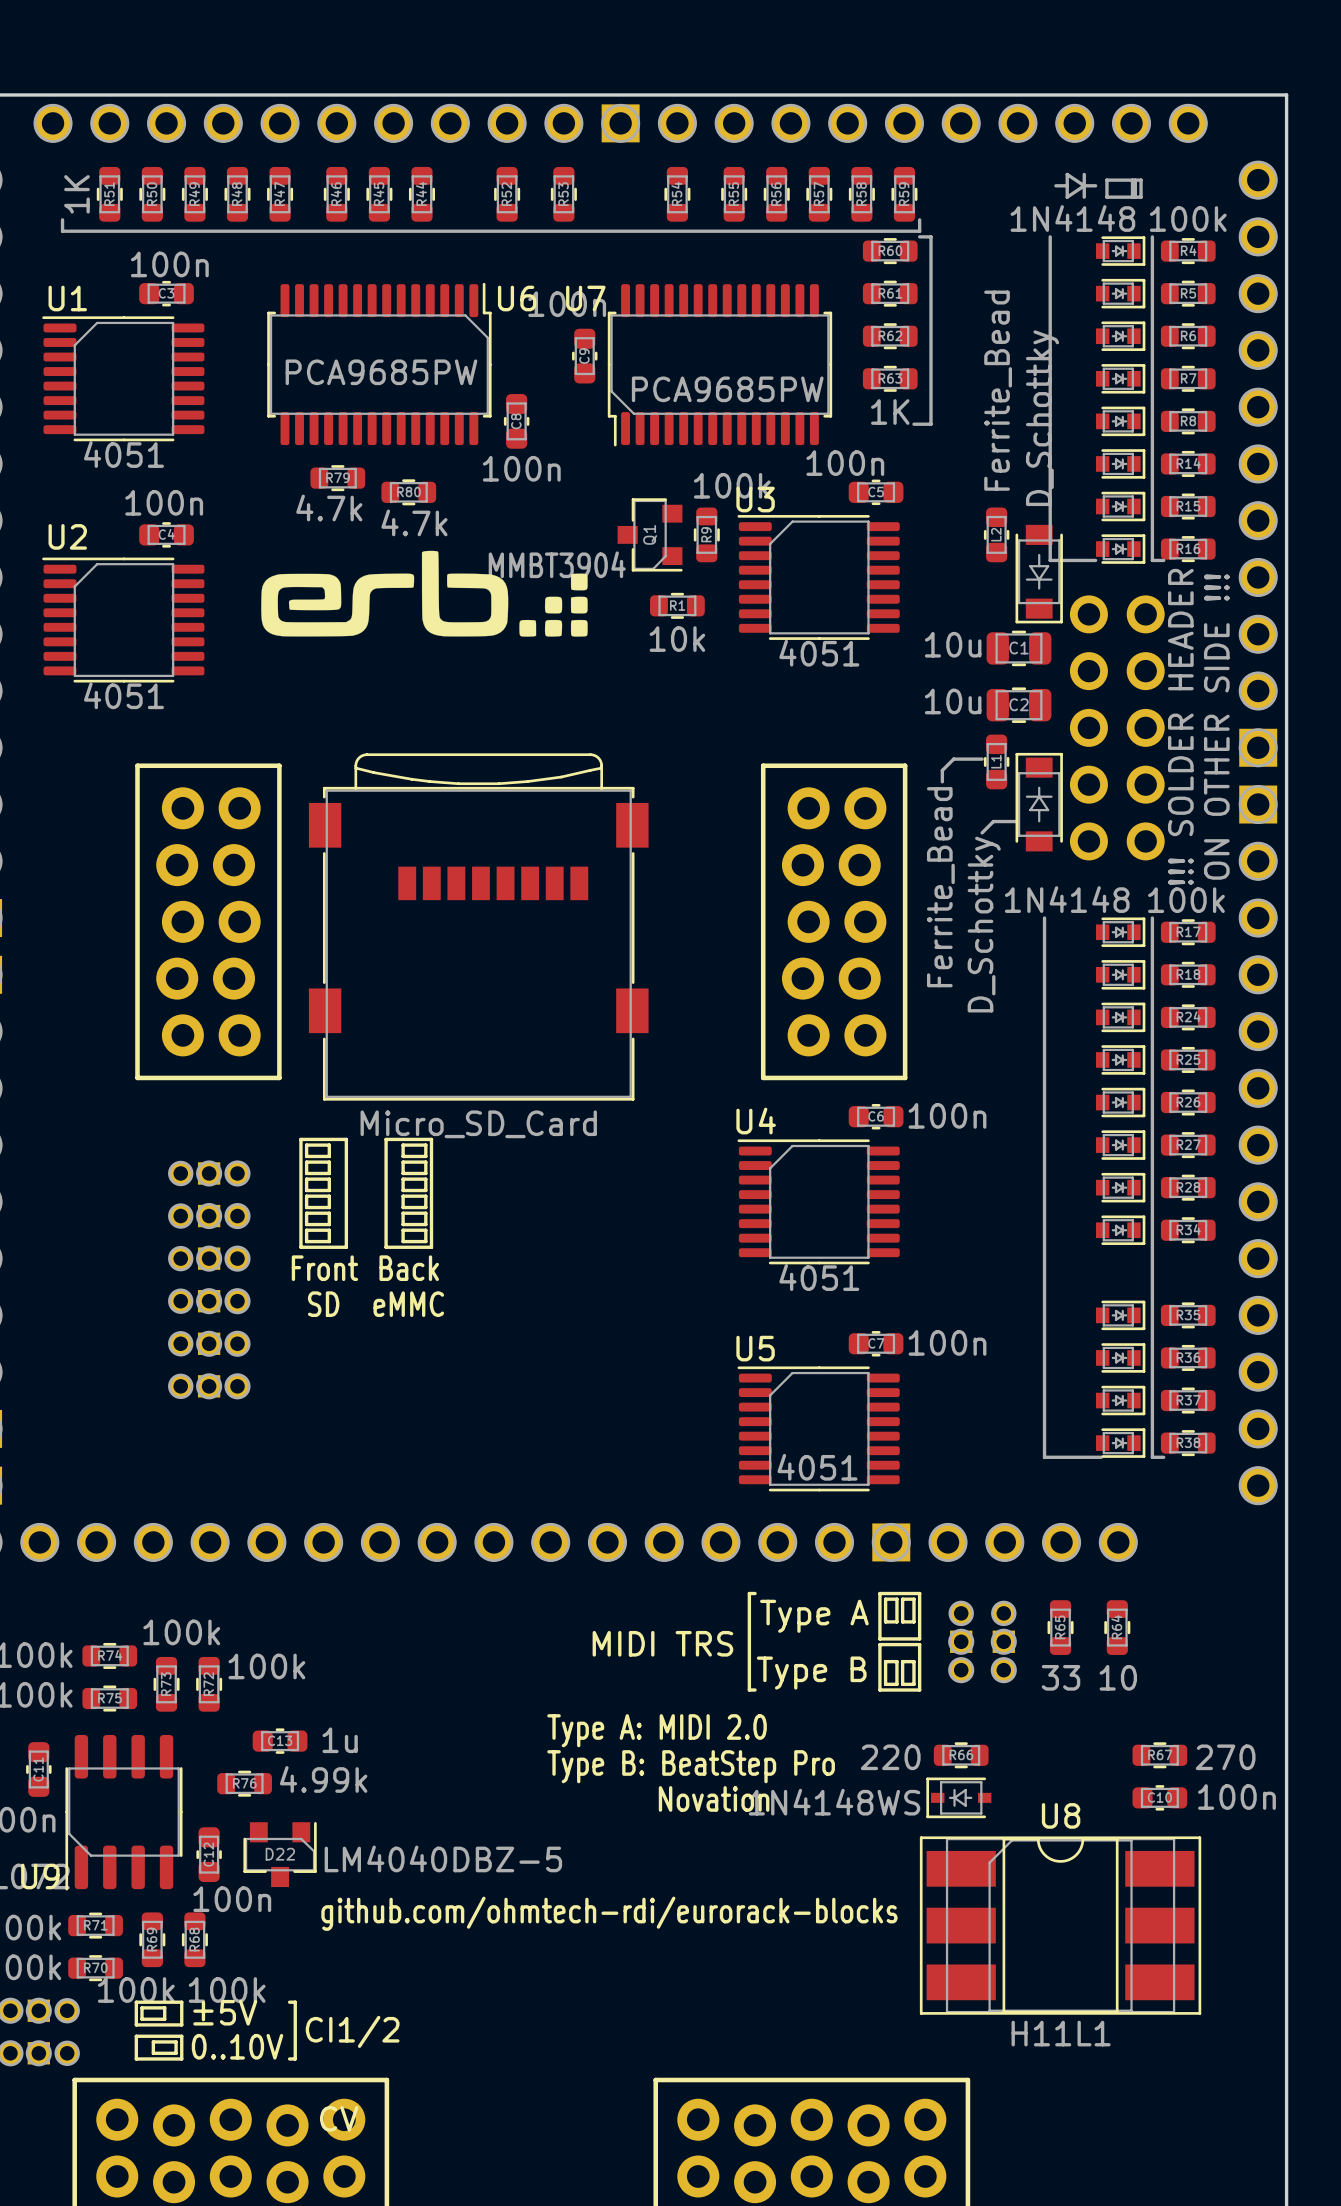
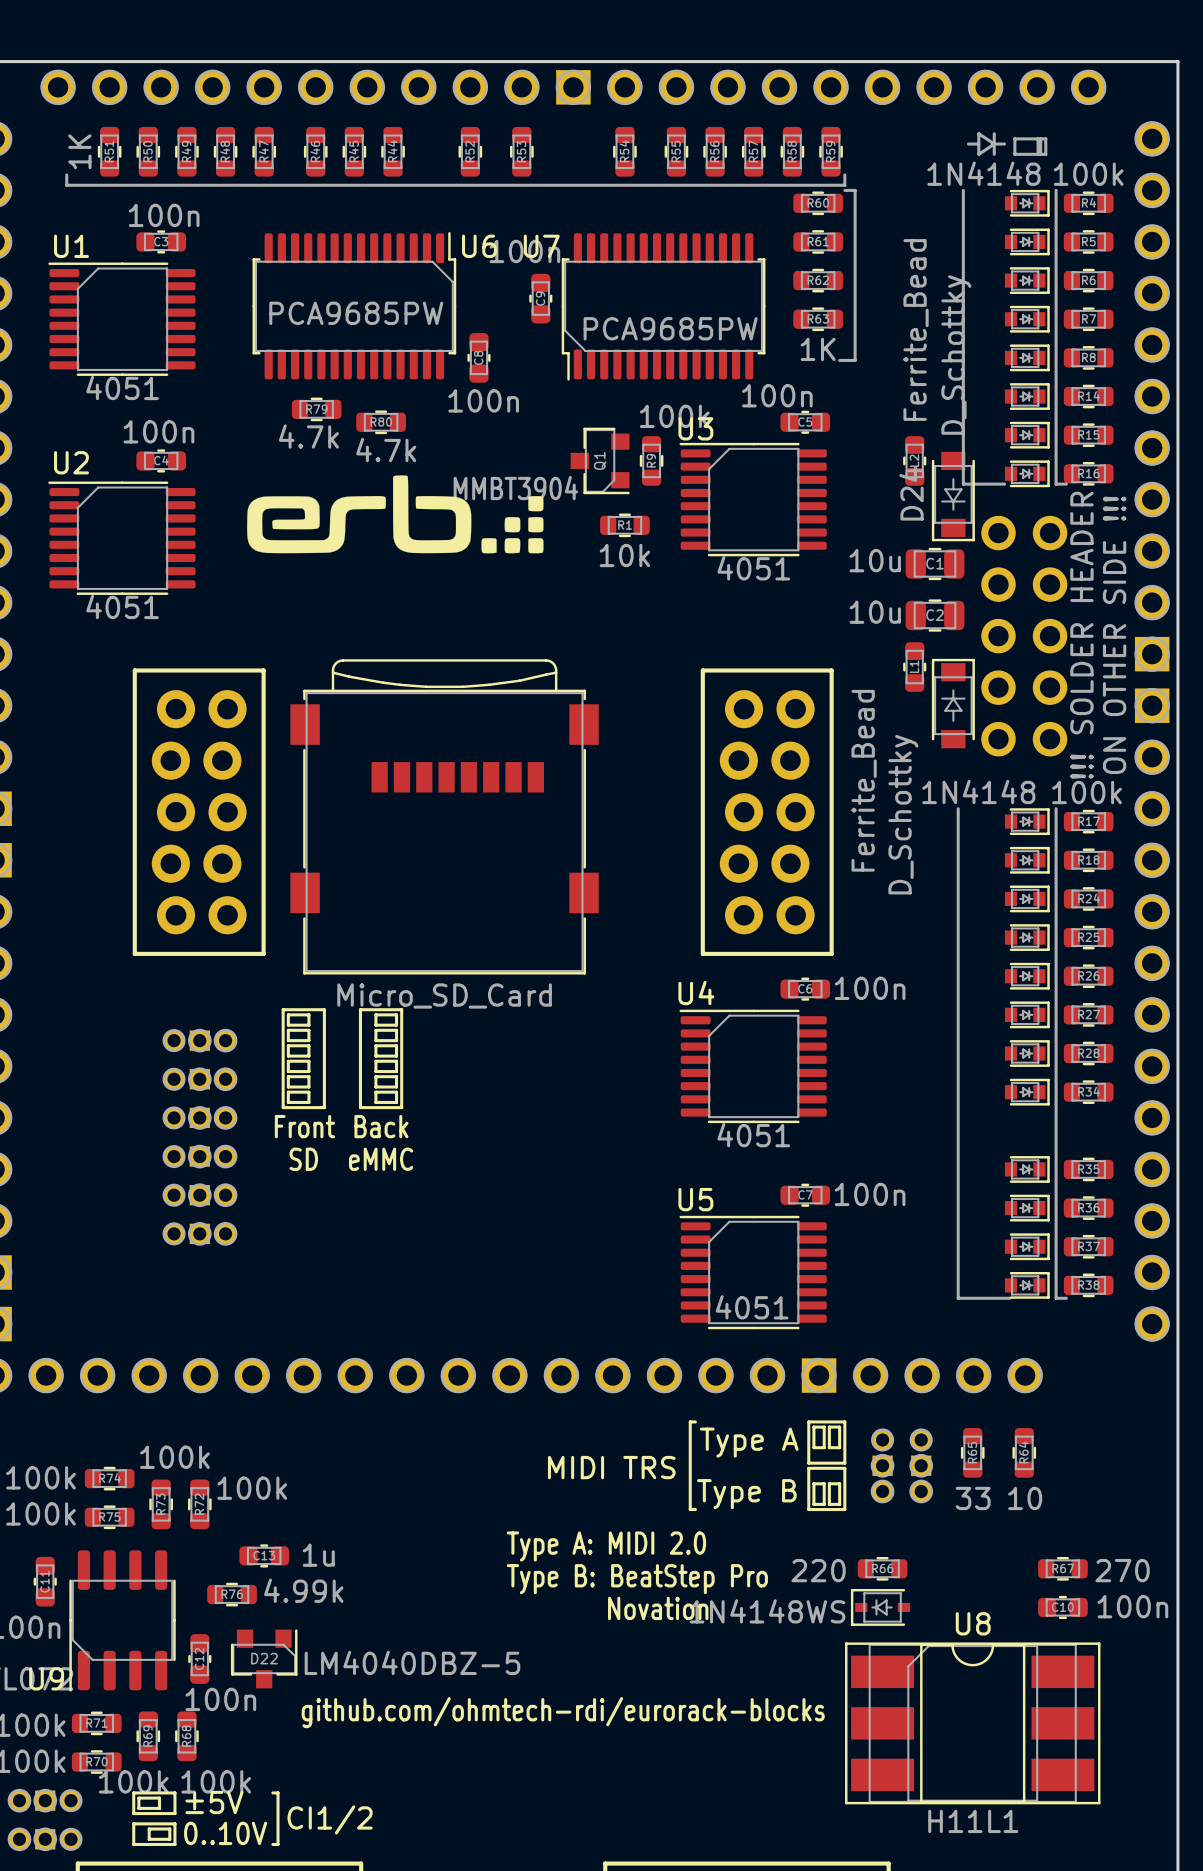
D24 name: none -> D24 (911, 493)
line: (982, 759) (953, 759) (942, 770) (942, 781) -> none
line: (1016, 821) (993, 821) (982, 832) -> none

